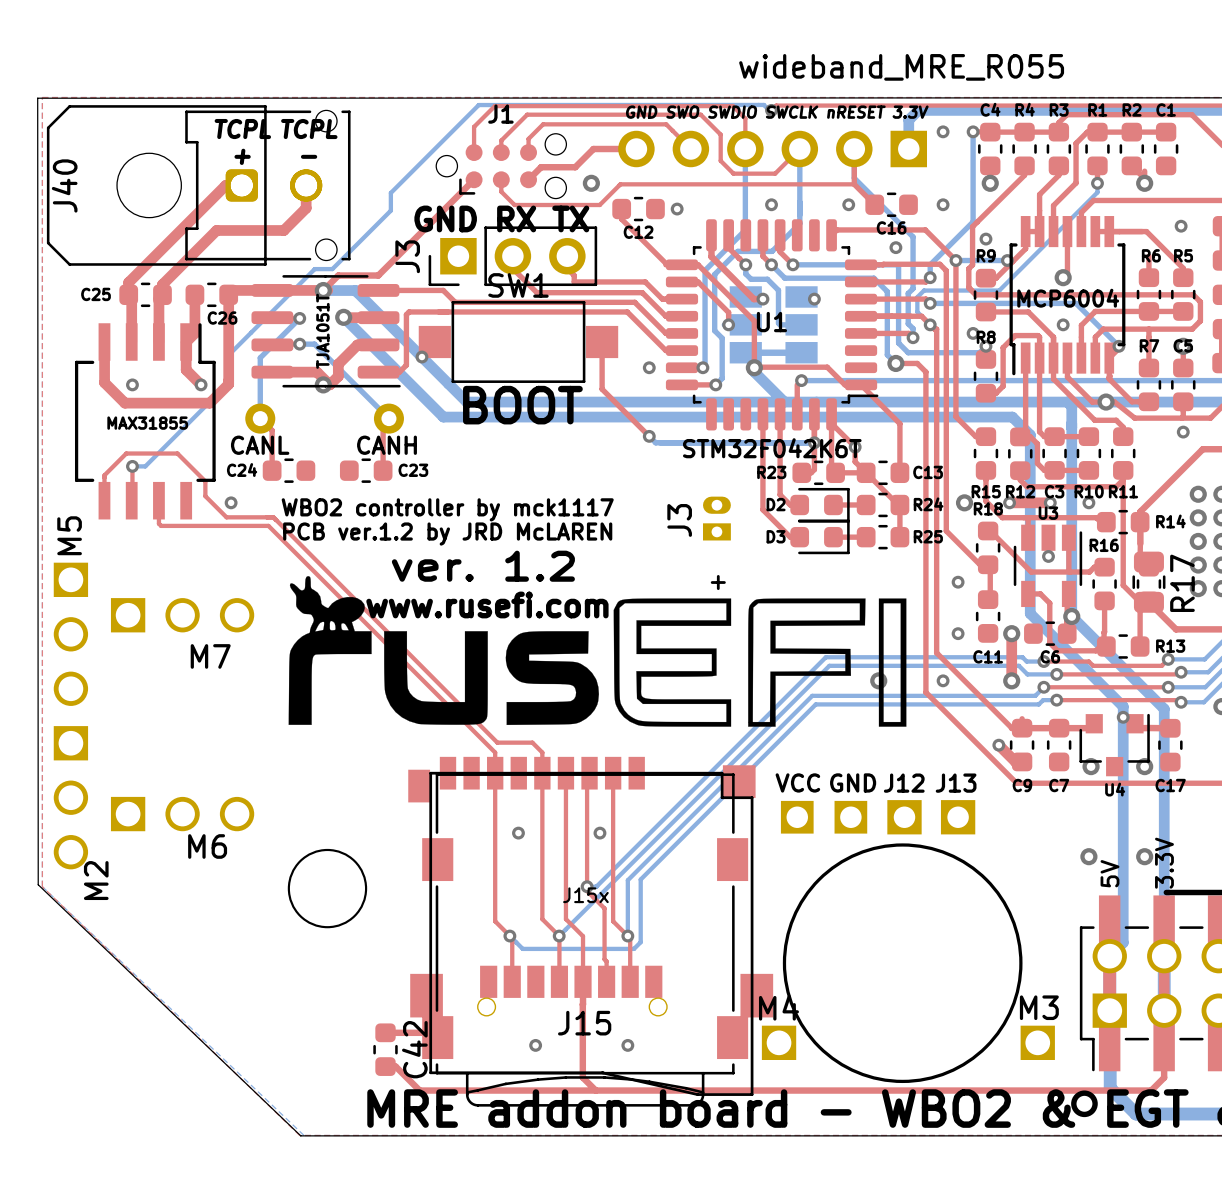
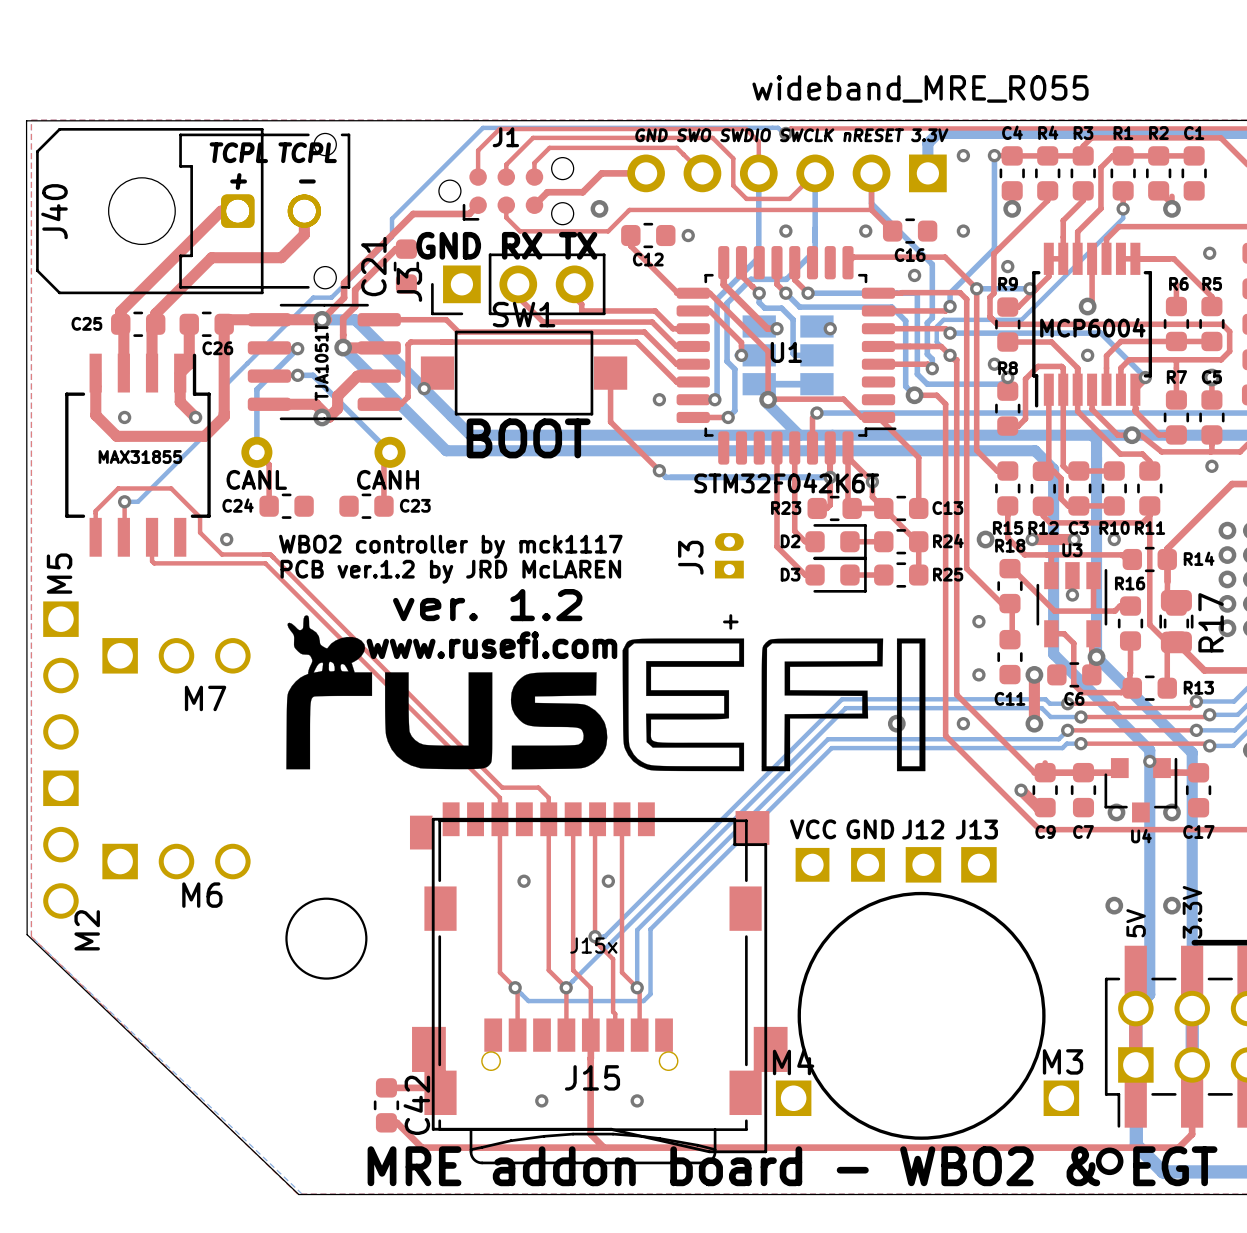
top track: (465, 188) (378, 275) (338, 275) -> (469, 213) (413, 213) (344, 283) (344, 297) (337, 304)
top track: none -> (406, 249) (395, 249) (355, 289) (355, 306) (343, 318) (343, 347)
C21: none -> (406, 266)

